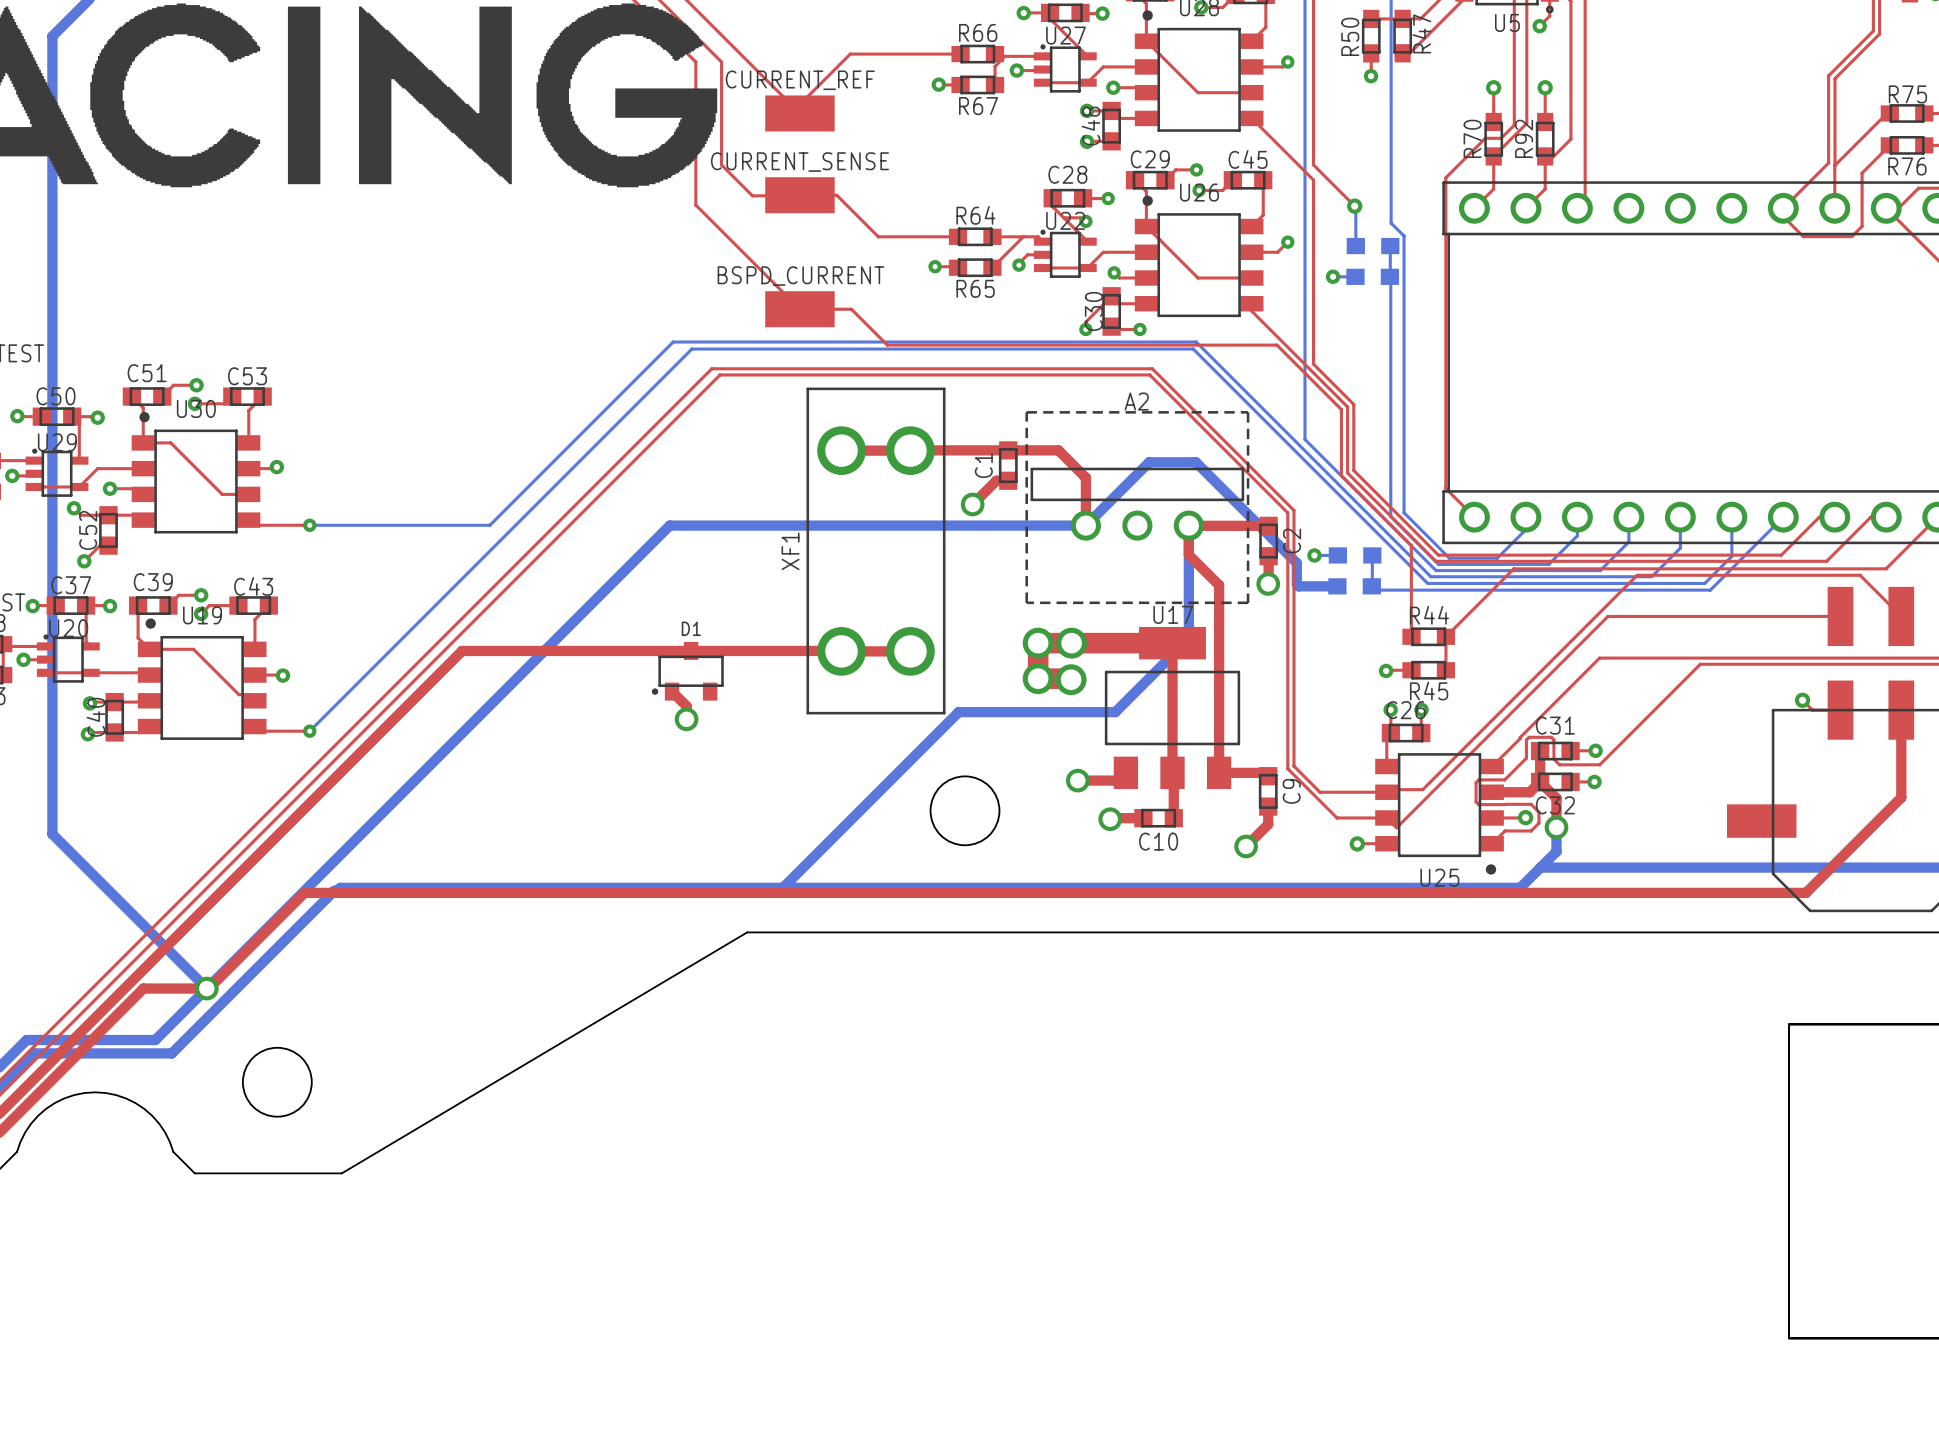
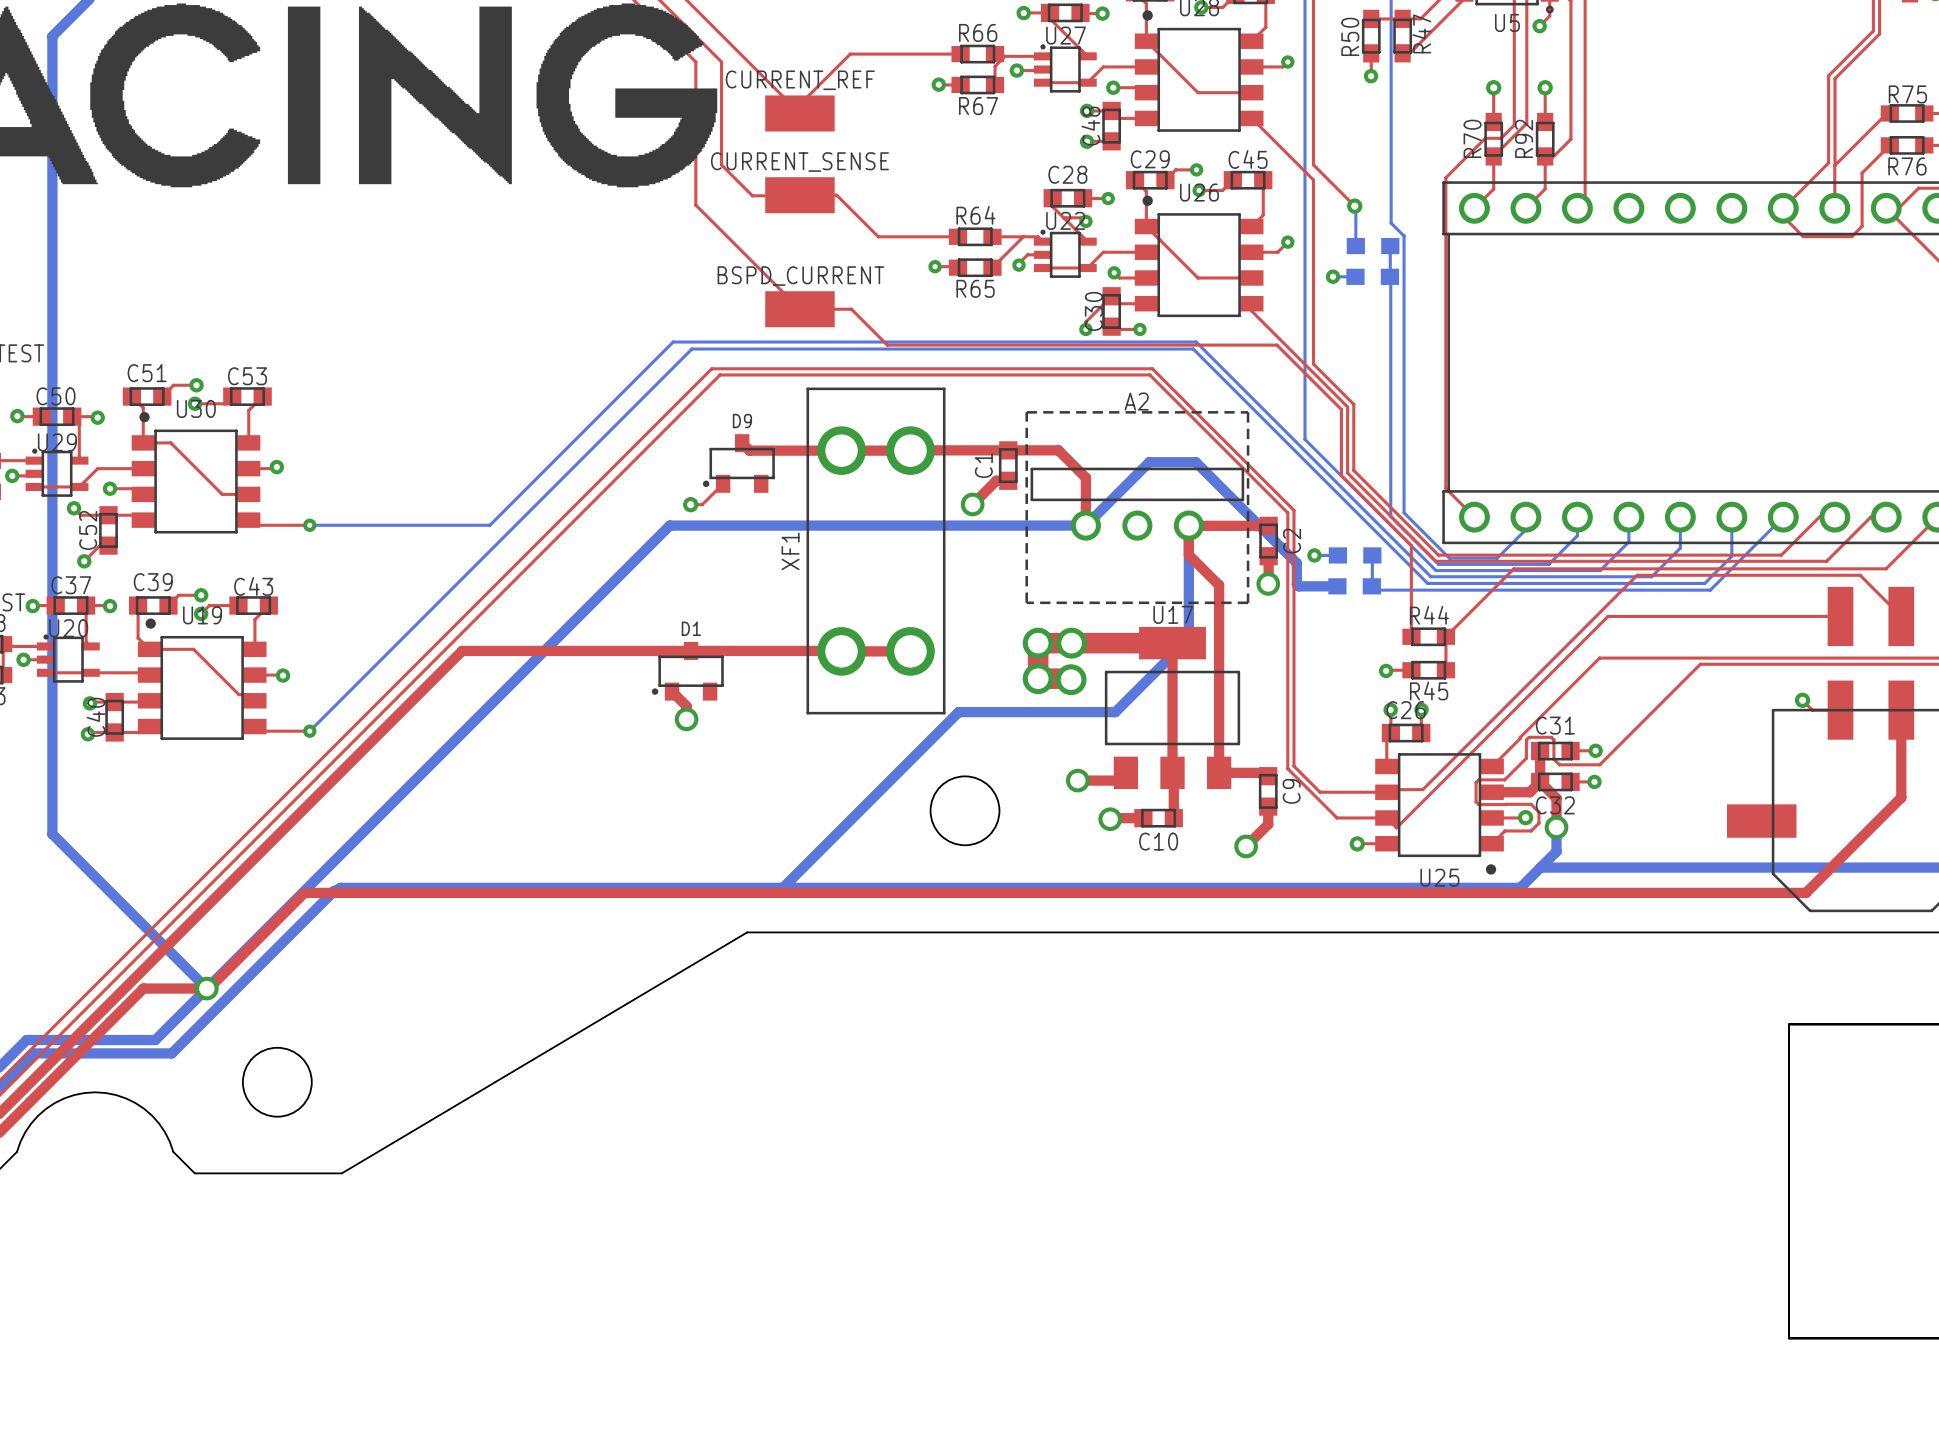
top track: none -> (742, 443) (749, 450) (841, 450)
D9: none -> (738, 463)
top track: none -> (723, 483) (702, 504) (690, 504)
via: none -> (690, 504)

